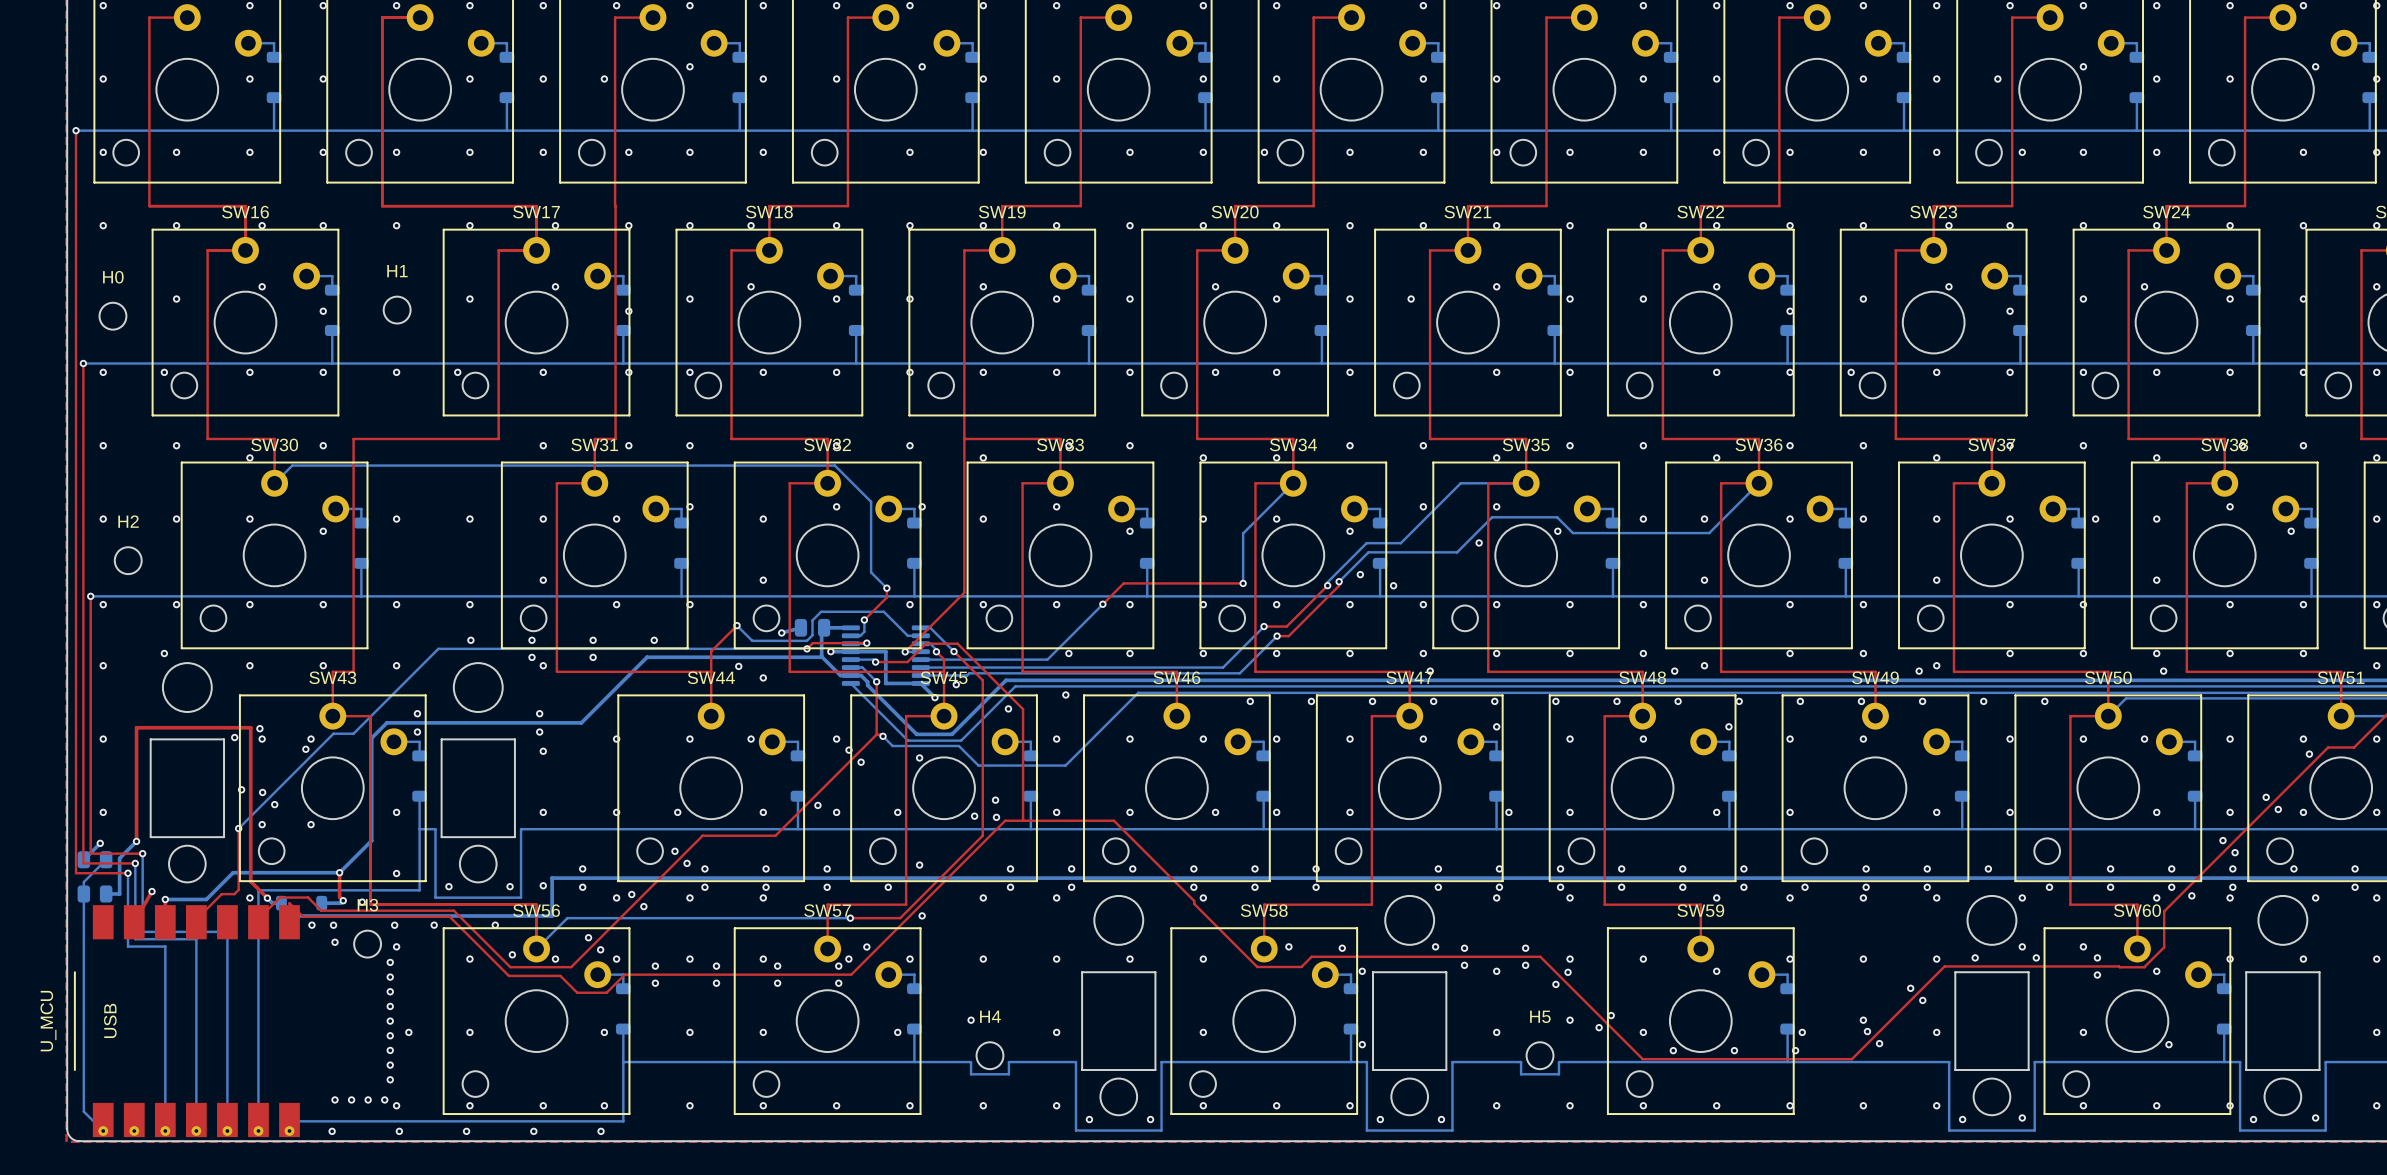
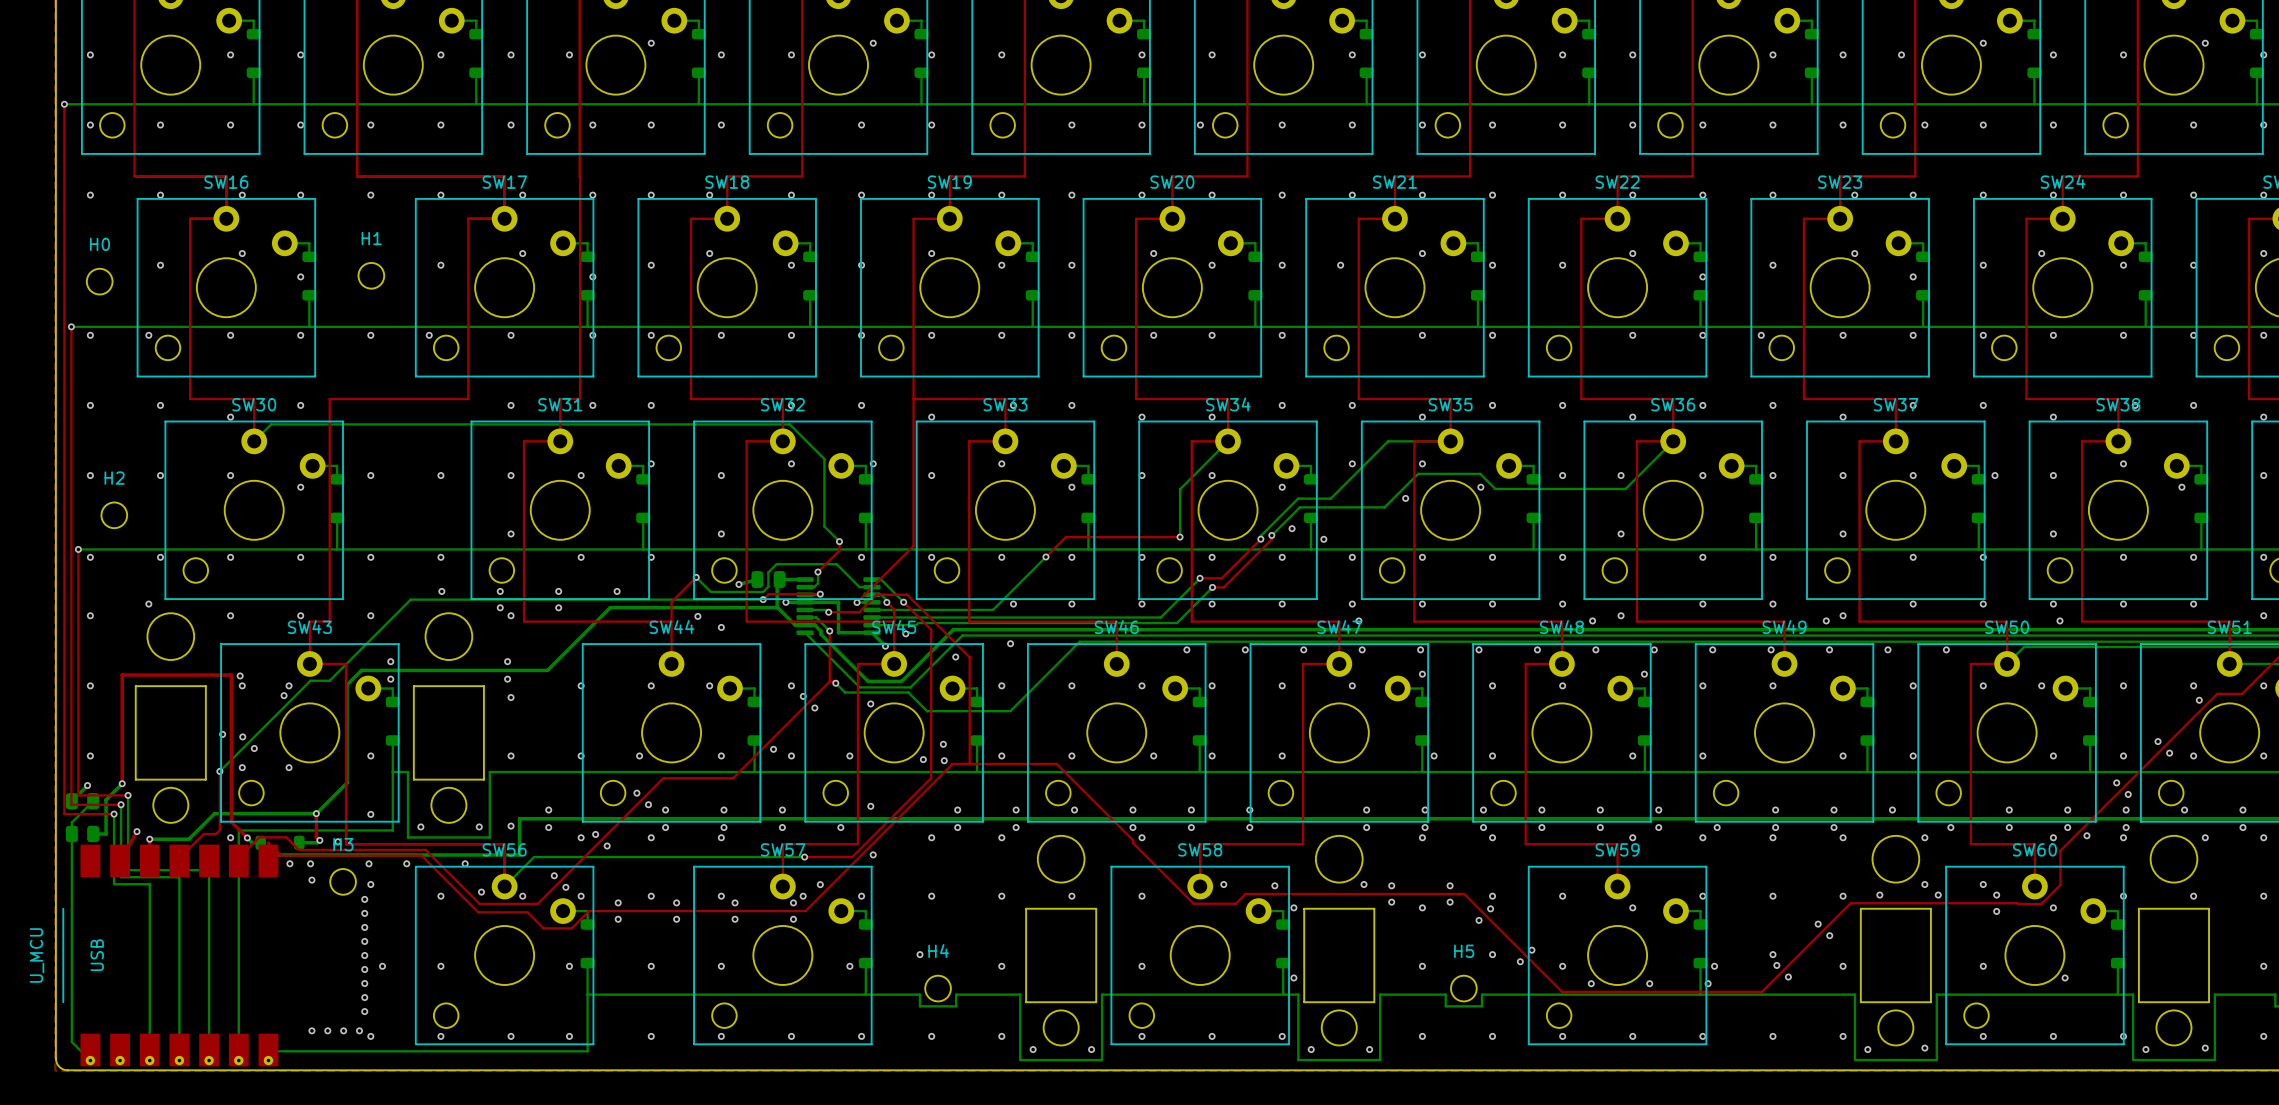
via: (234, 737) -> none
via: (332, 1131) -> none
via: (399, 1131) -> none
via: (466, 1131) -> none
via: (533, 1131) -> none
via: (601, 1131) -> none

